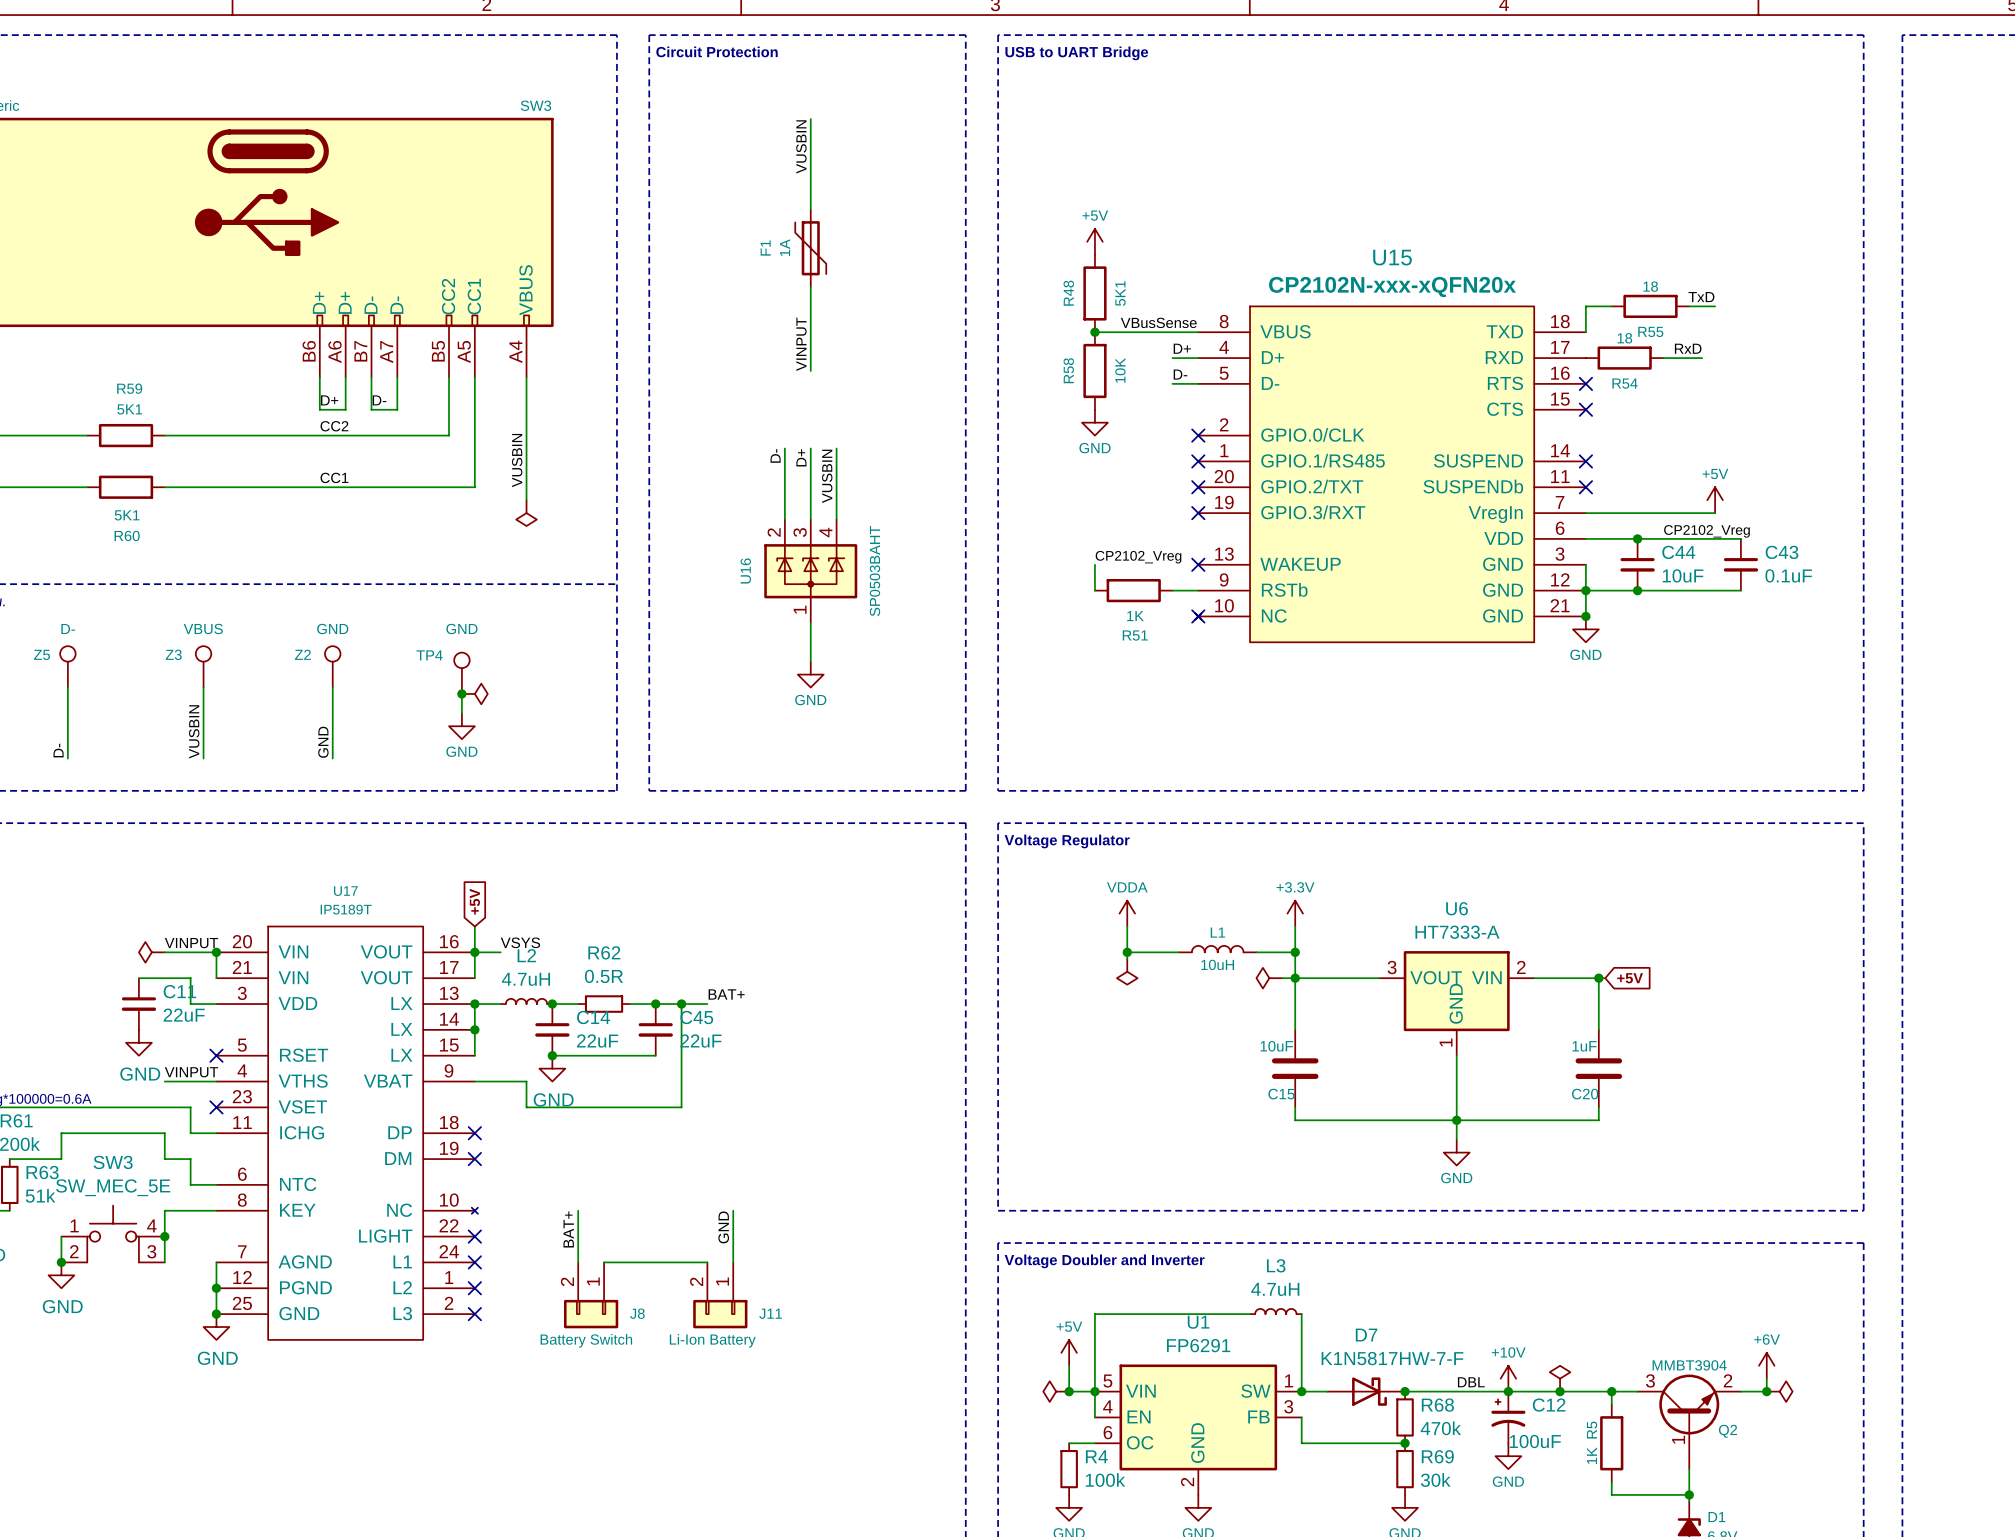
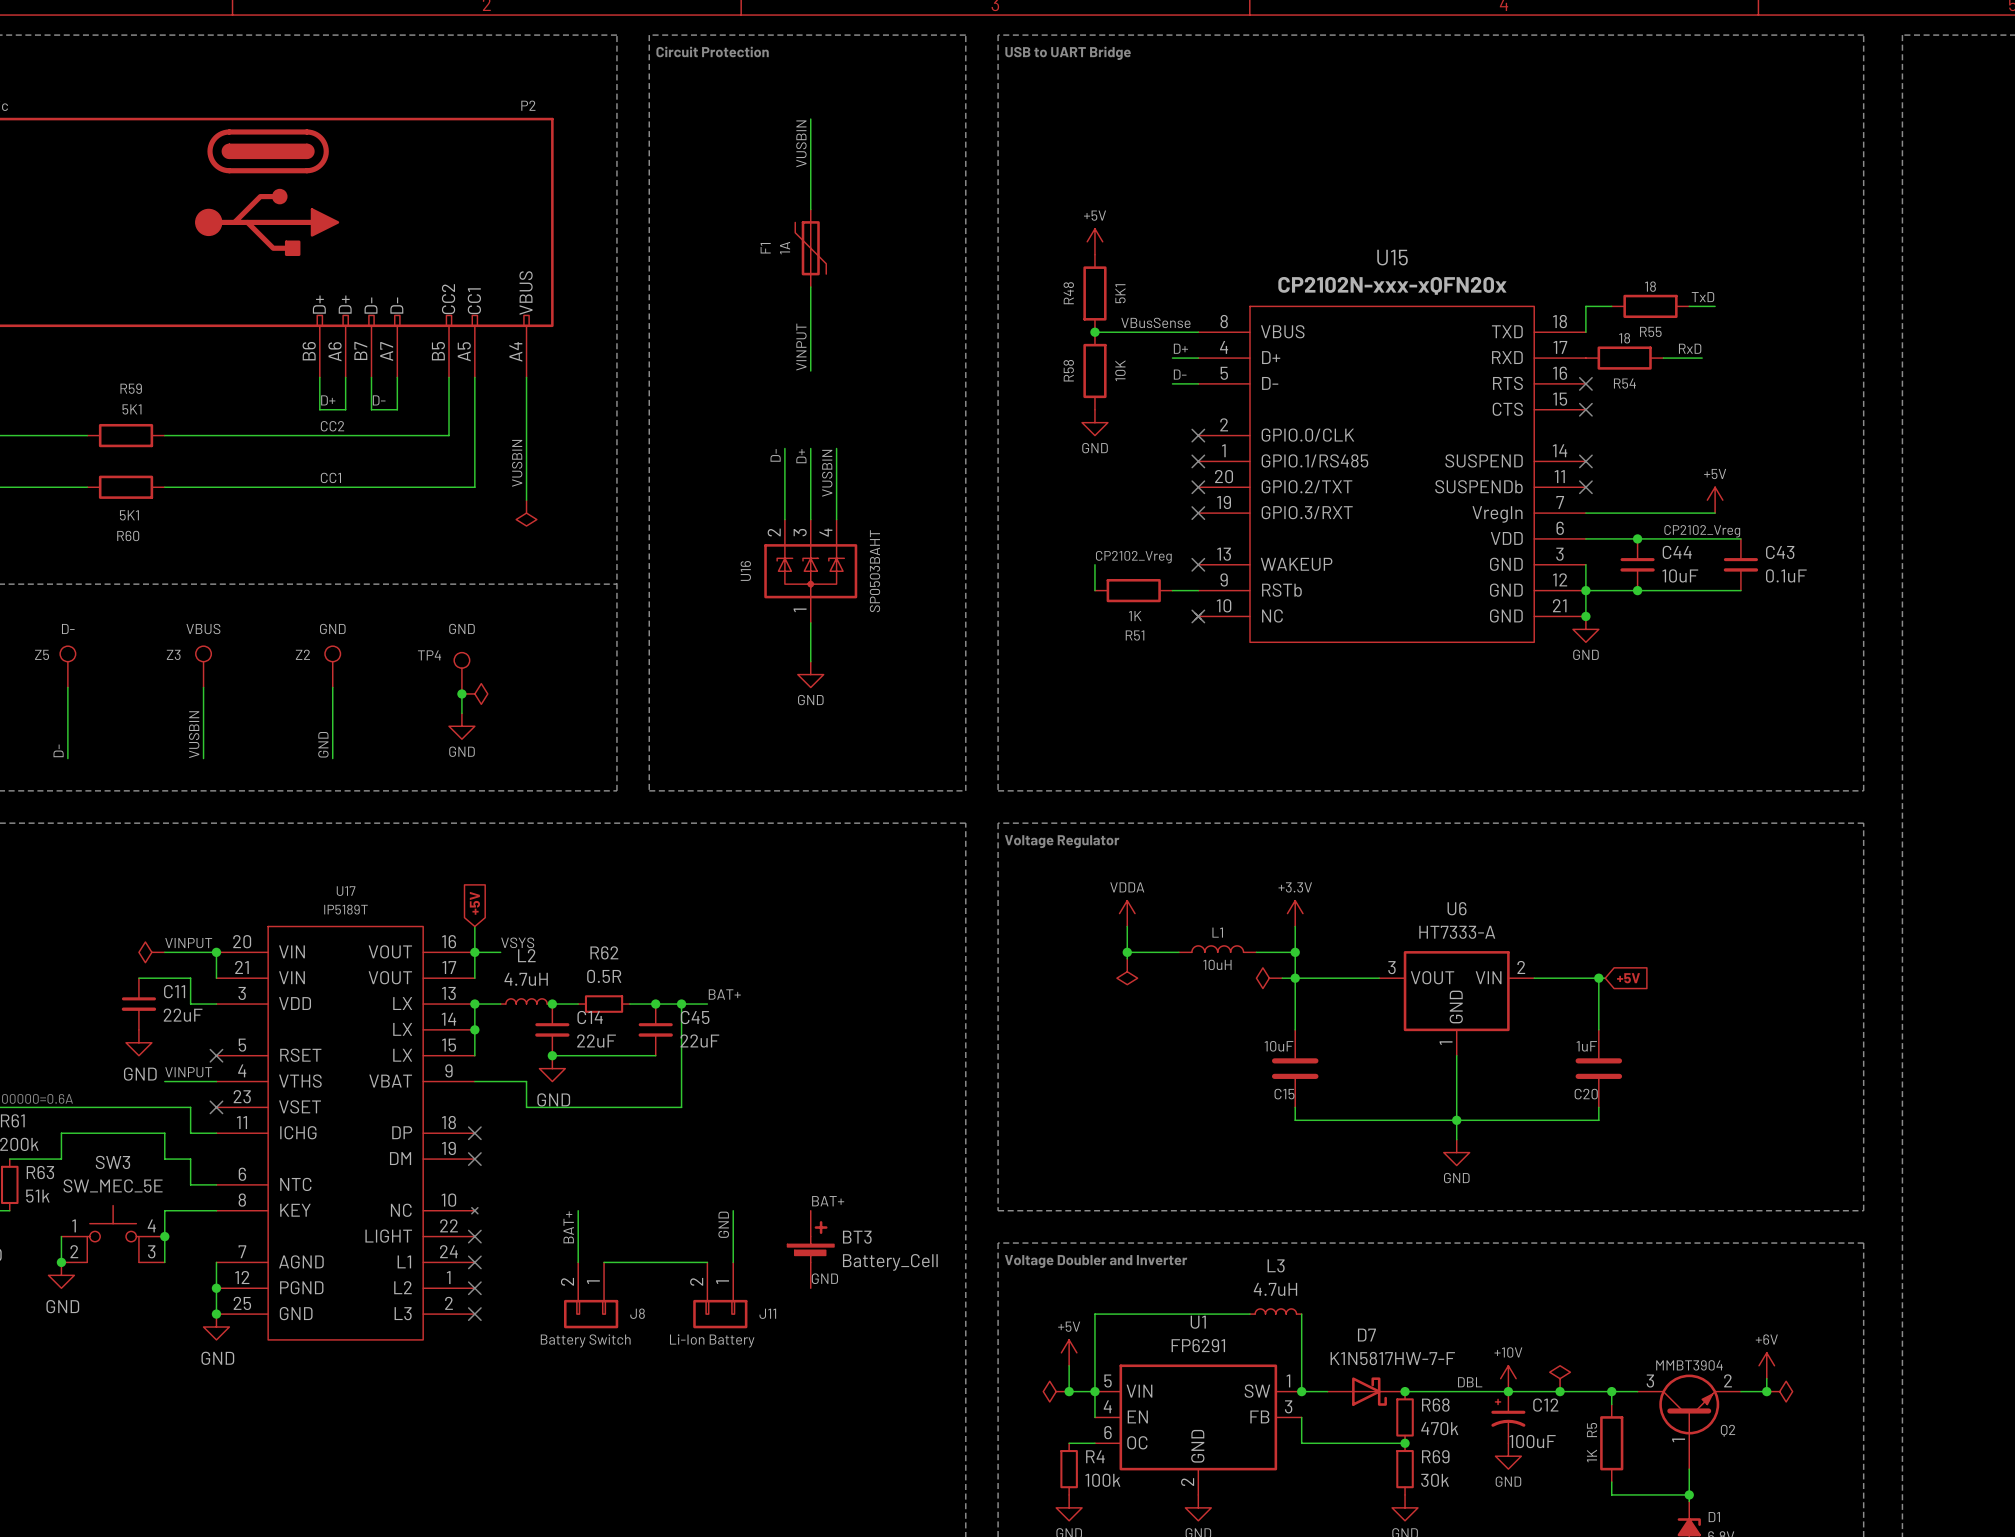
SW3 name: SW3 (535, 105) -> P2 (528, 105)
label: none -> BAT+ (828, 1201)
BT3: none -> Battery_Cell (810, 1249)
label: none -> GND (824, 1278)

